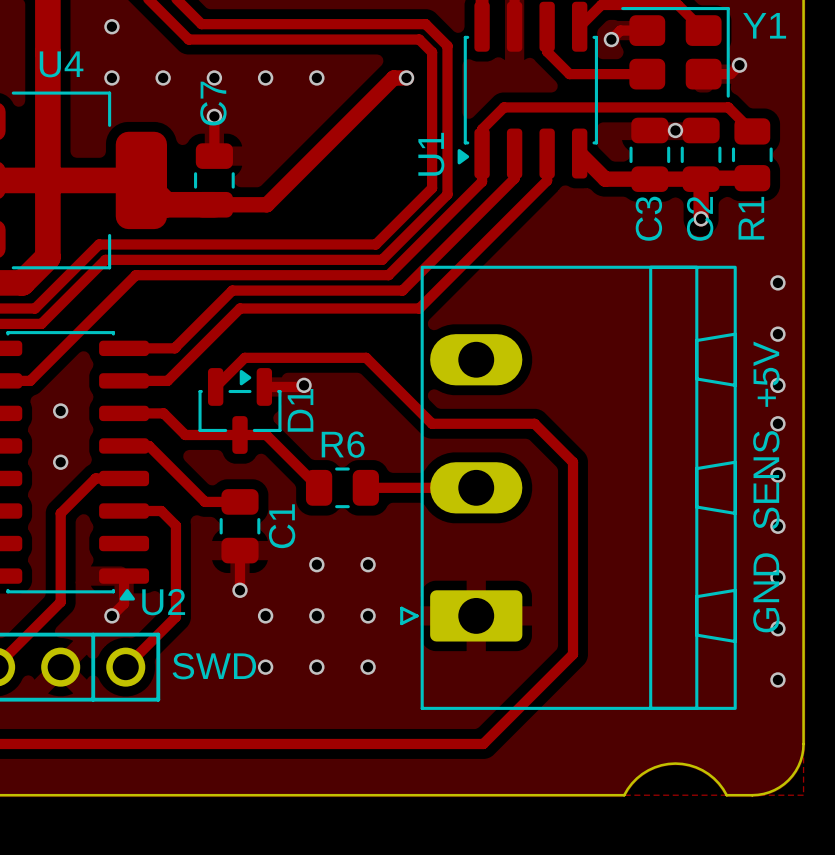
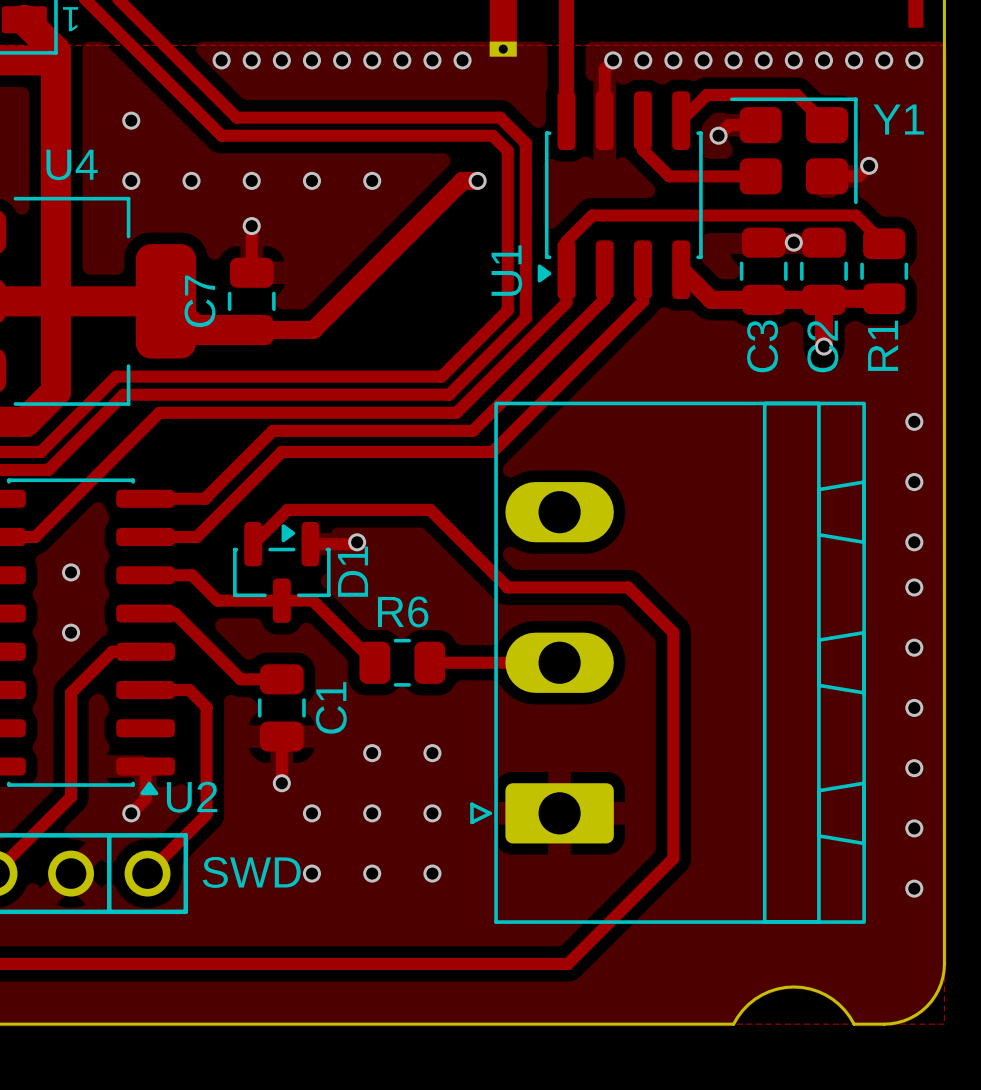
C7 name position: C7 (213, 103) -> C7 (200, 301)
text: GND SENS +5V (766, 486) -> none

